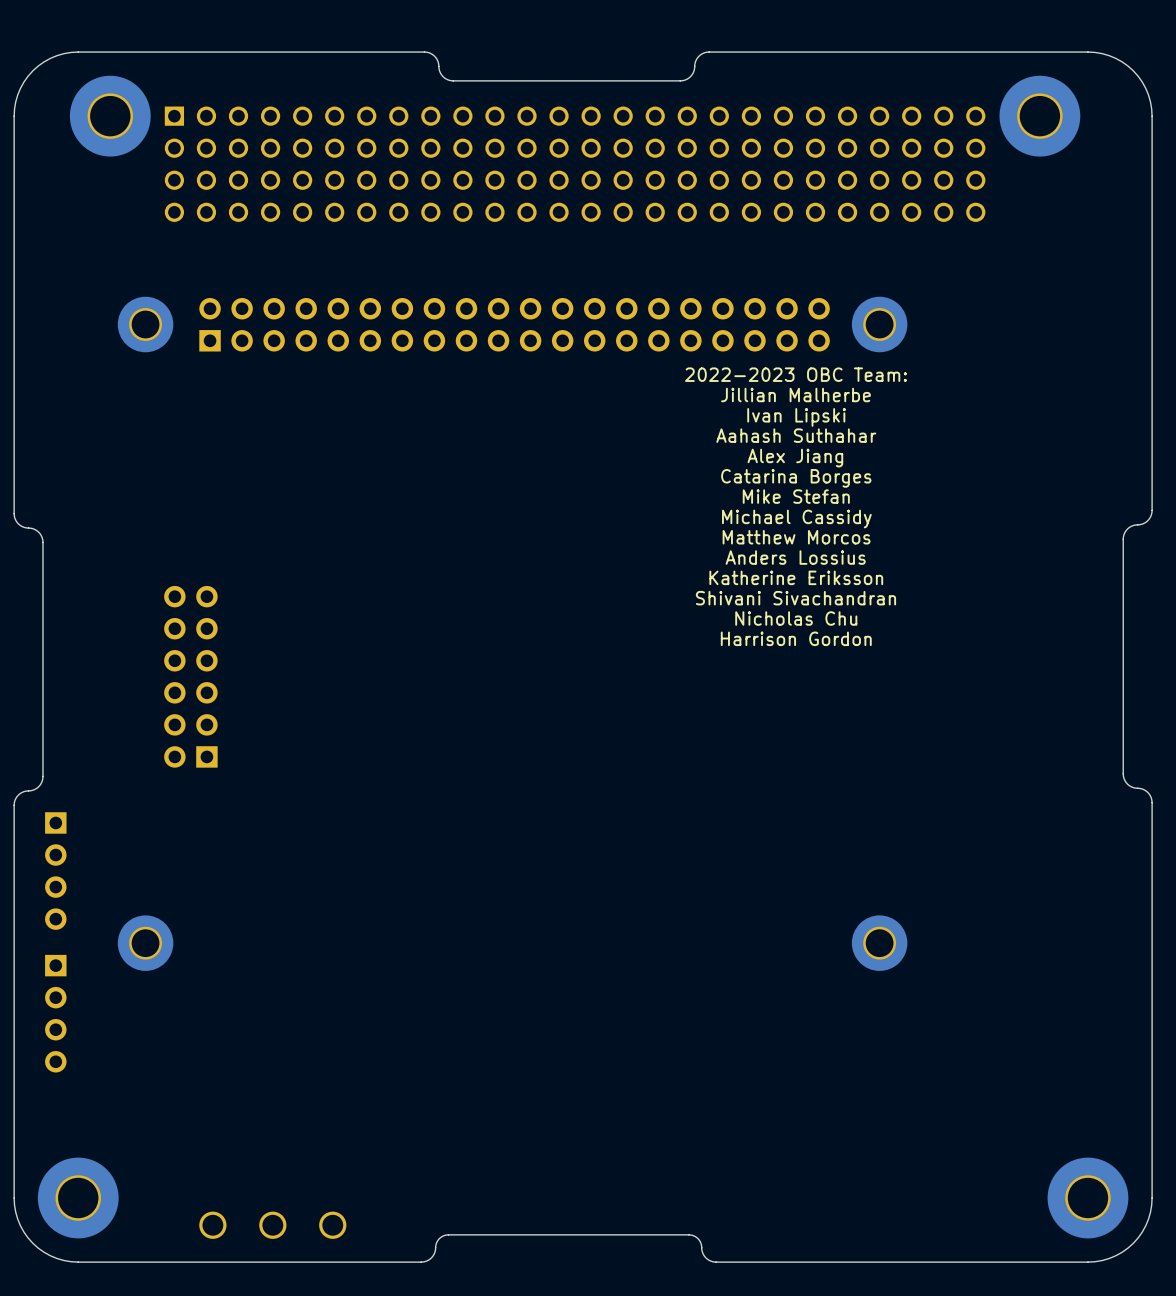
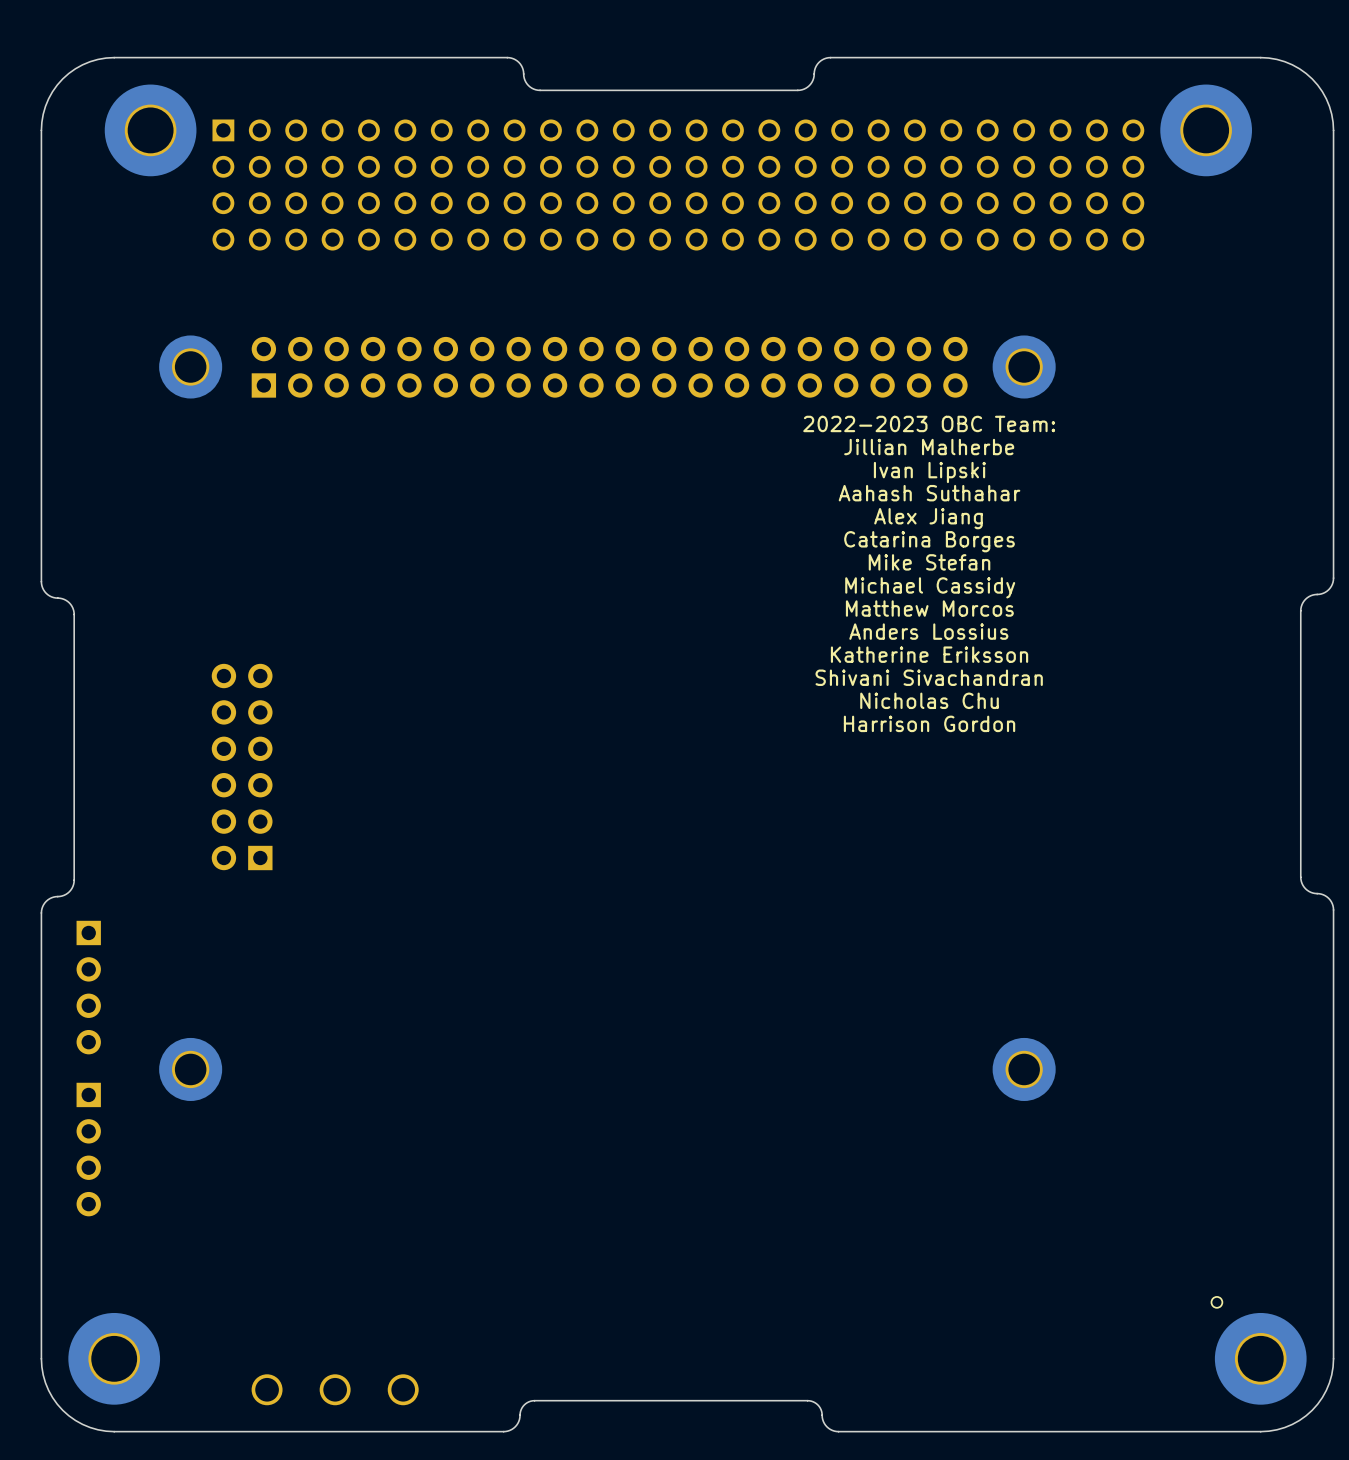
part: none -> (1216, 1302)

